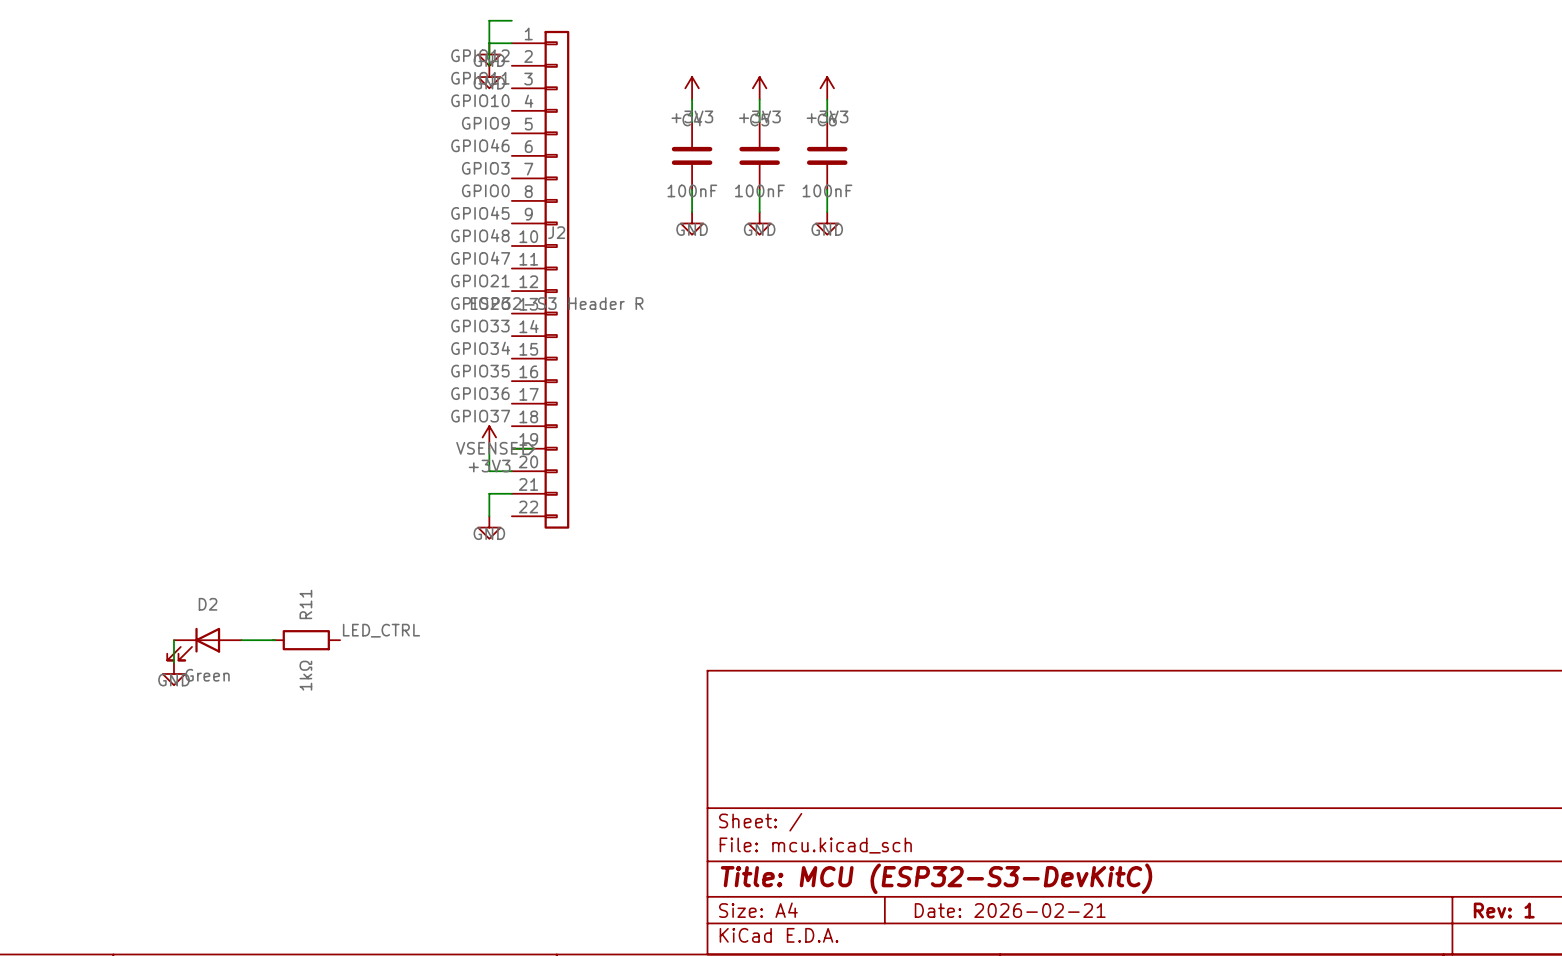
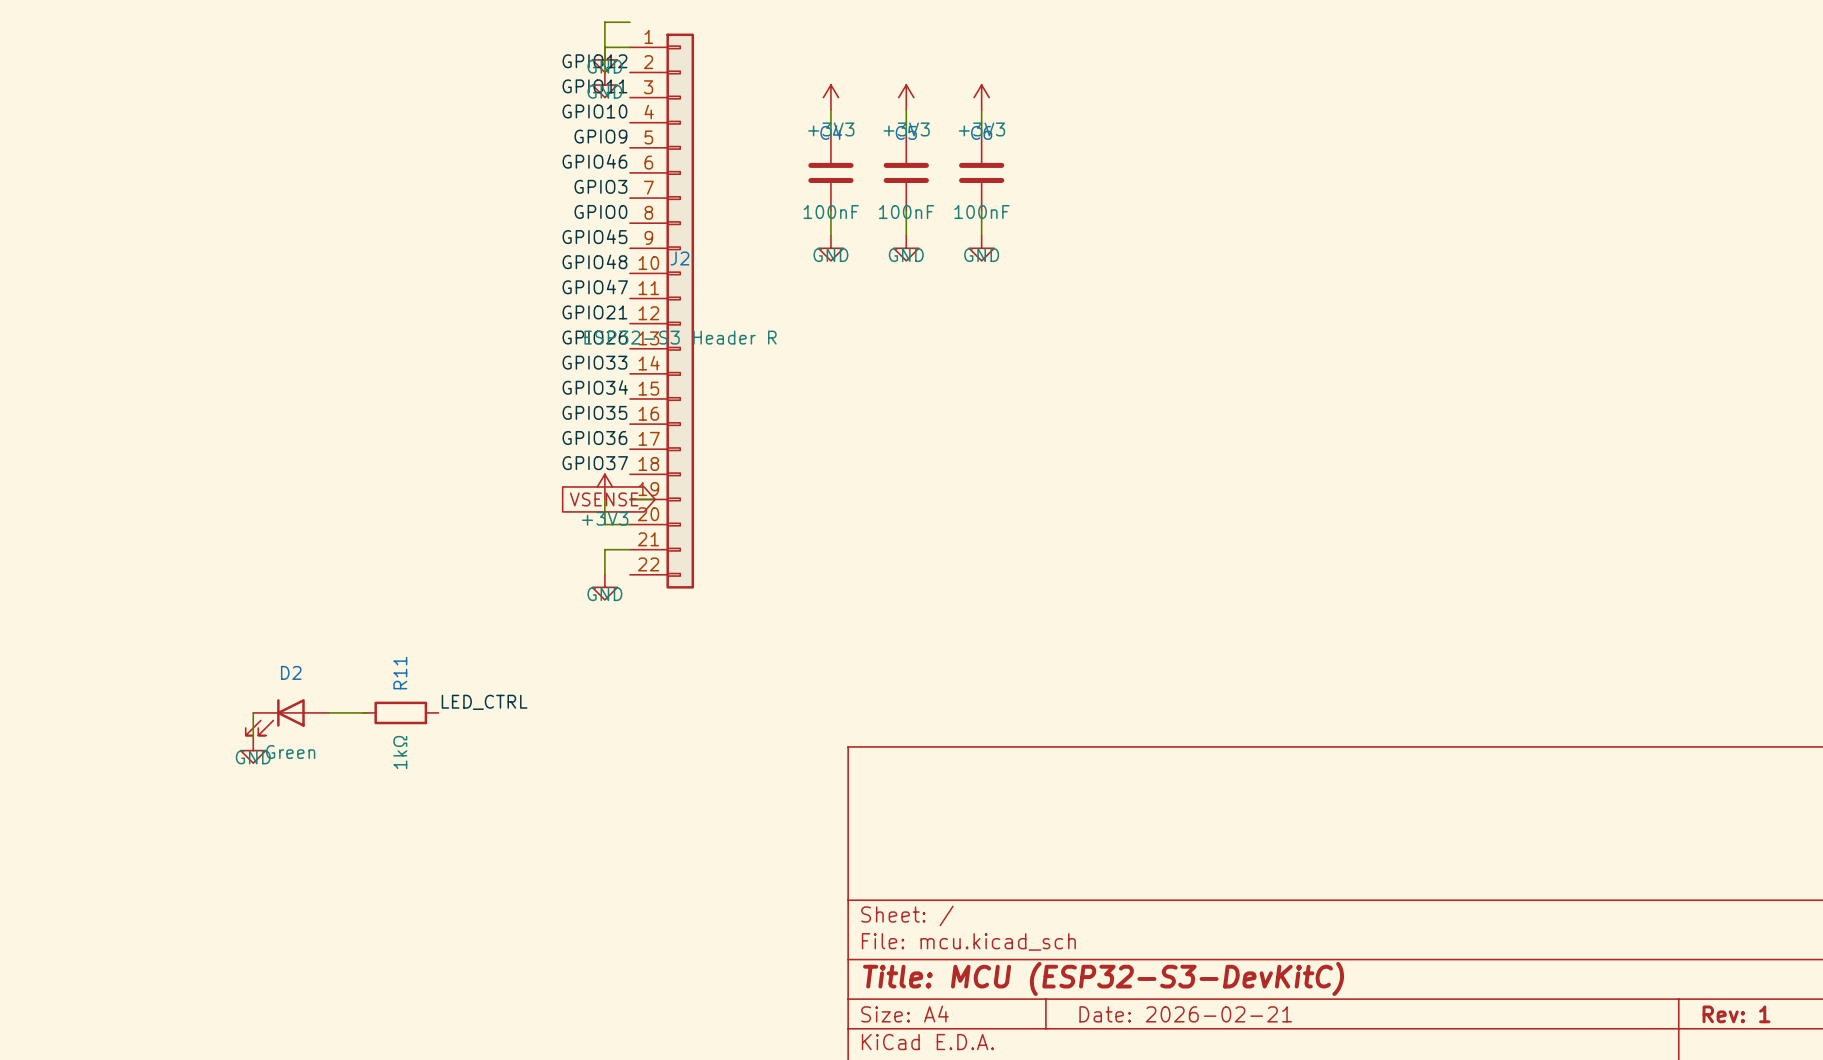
hierarchical label: VSENSE (487, 448) -> none
global label: none -> VSENSE (604, 499)

